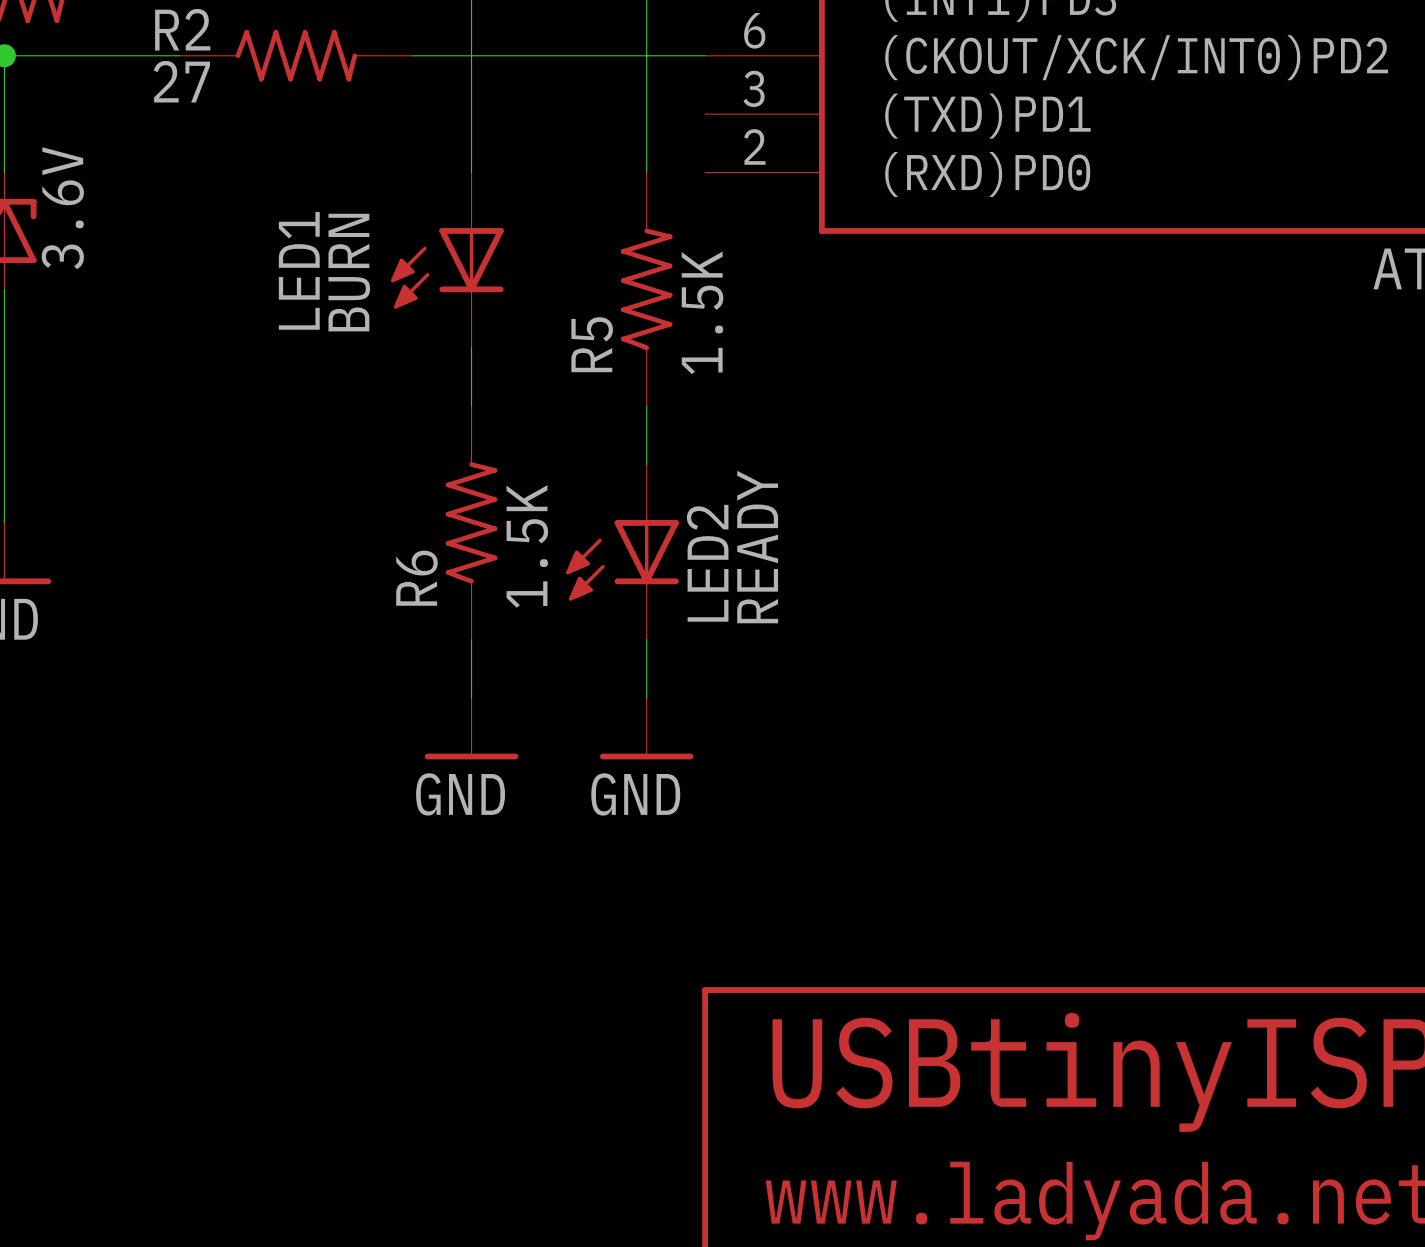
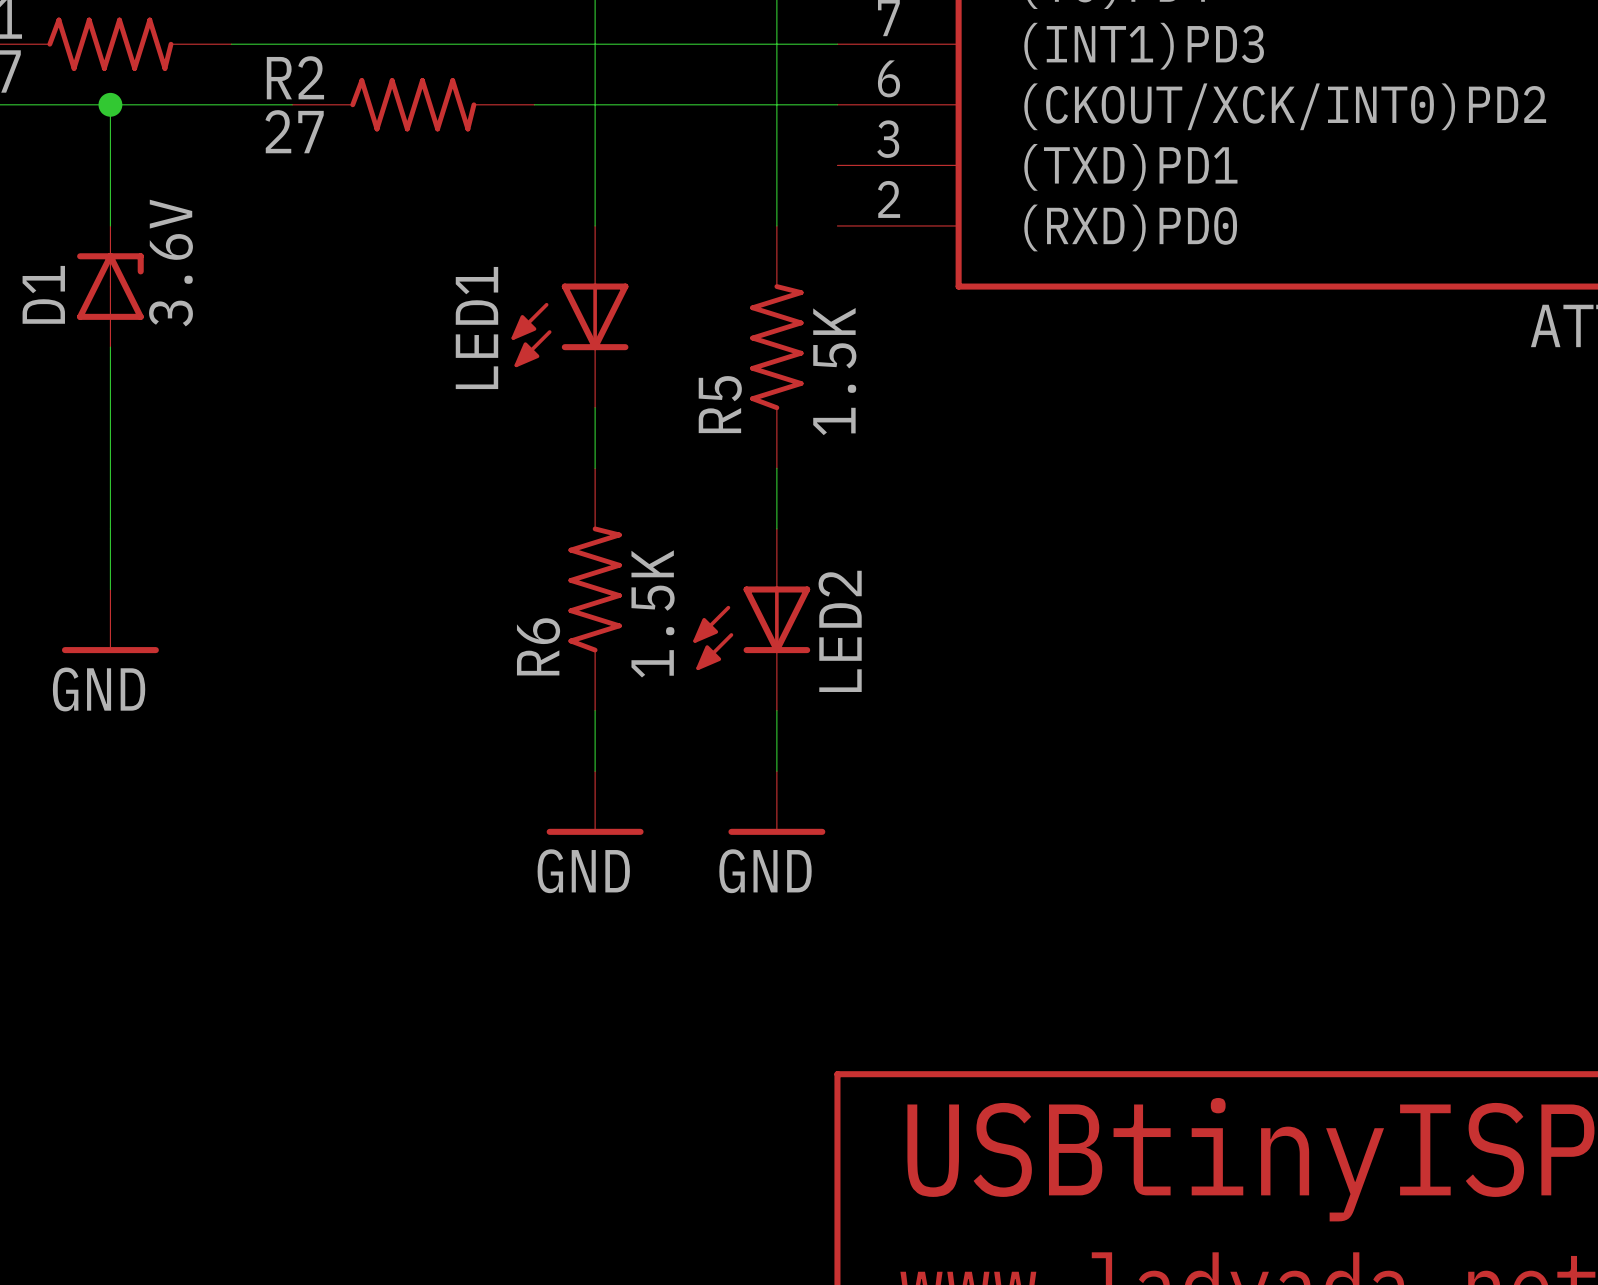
LED1 name position: LED1 (299, 270) -> LED1 (476, 328)
LED1 value: BURN (349, 272) -> none
LED2 value: READY (757, 547) -> none

